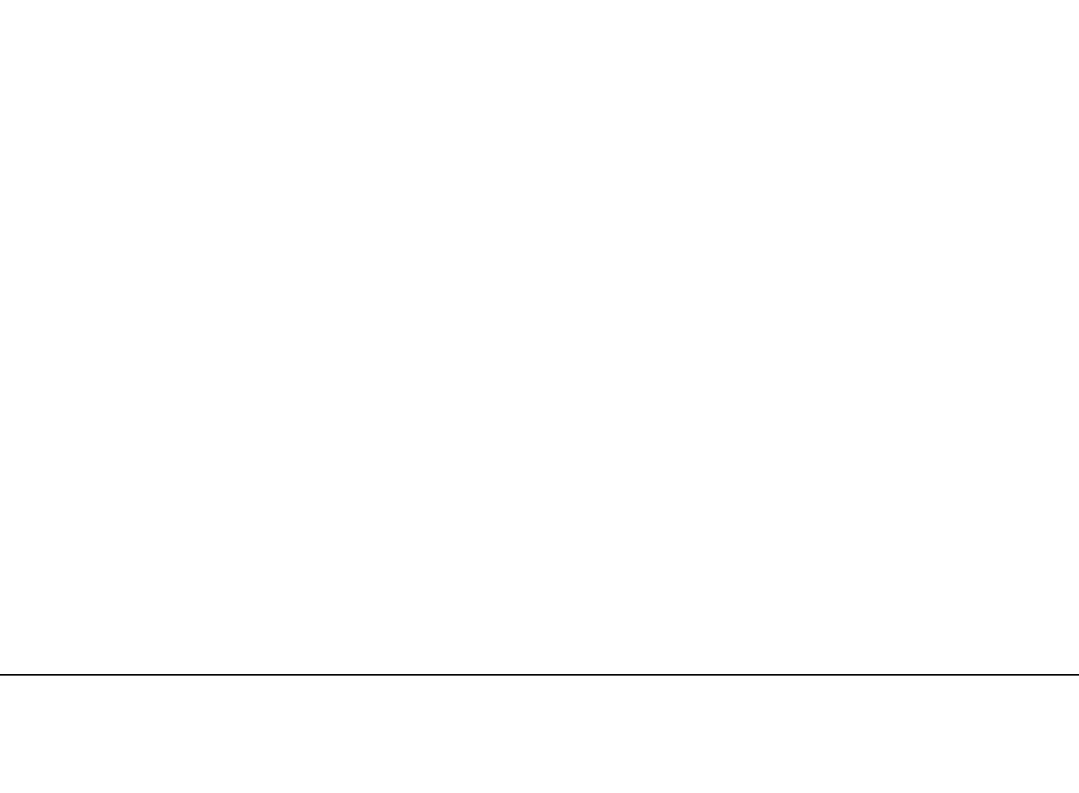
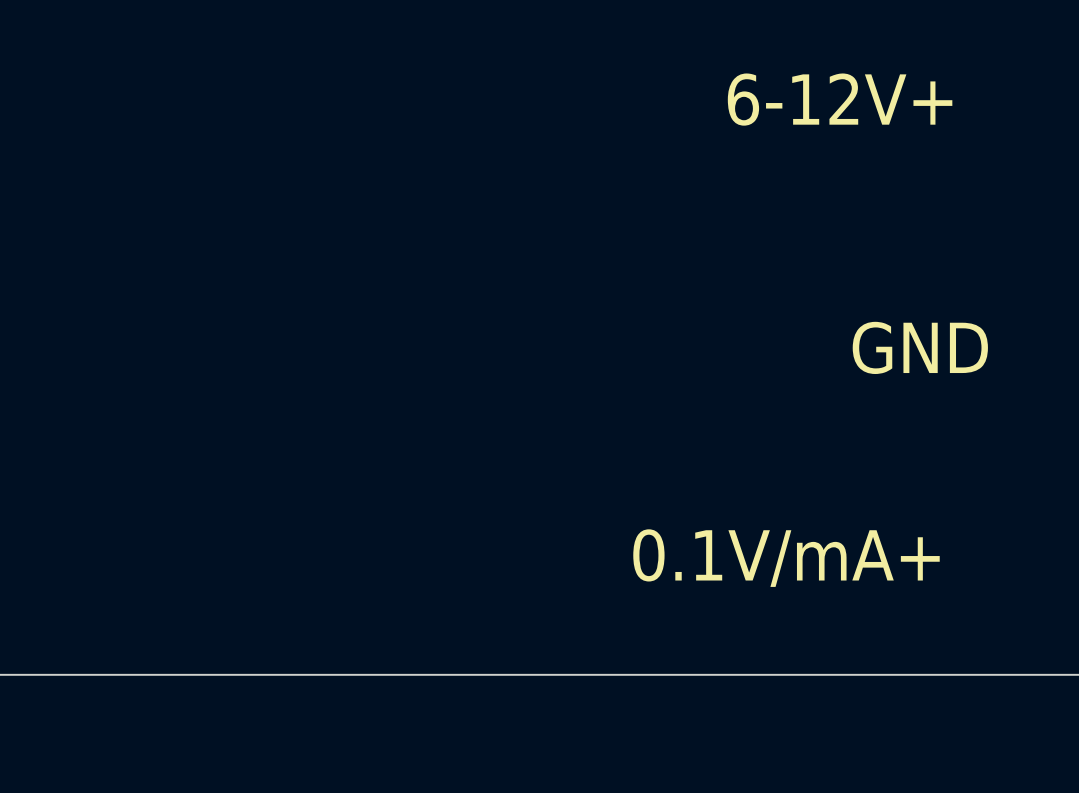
text: none -> 6-12V+ (840, 99)
text: none -> GND (920, 347)
text: none -> 0.1V/mA+ (786, 558)

